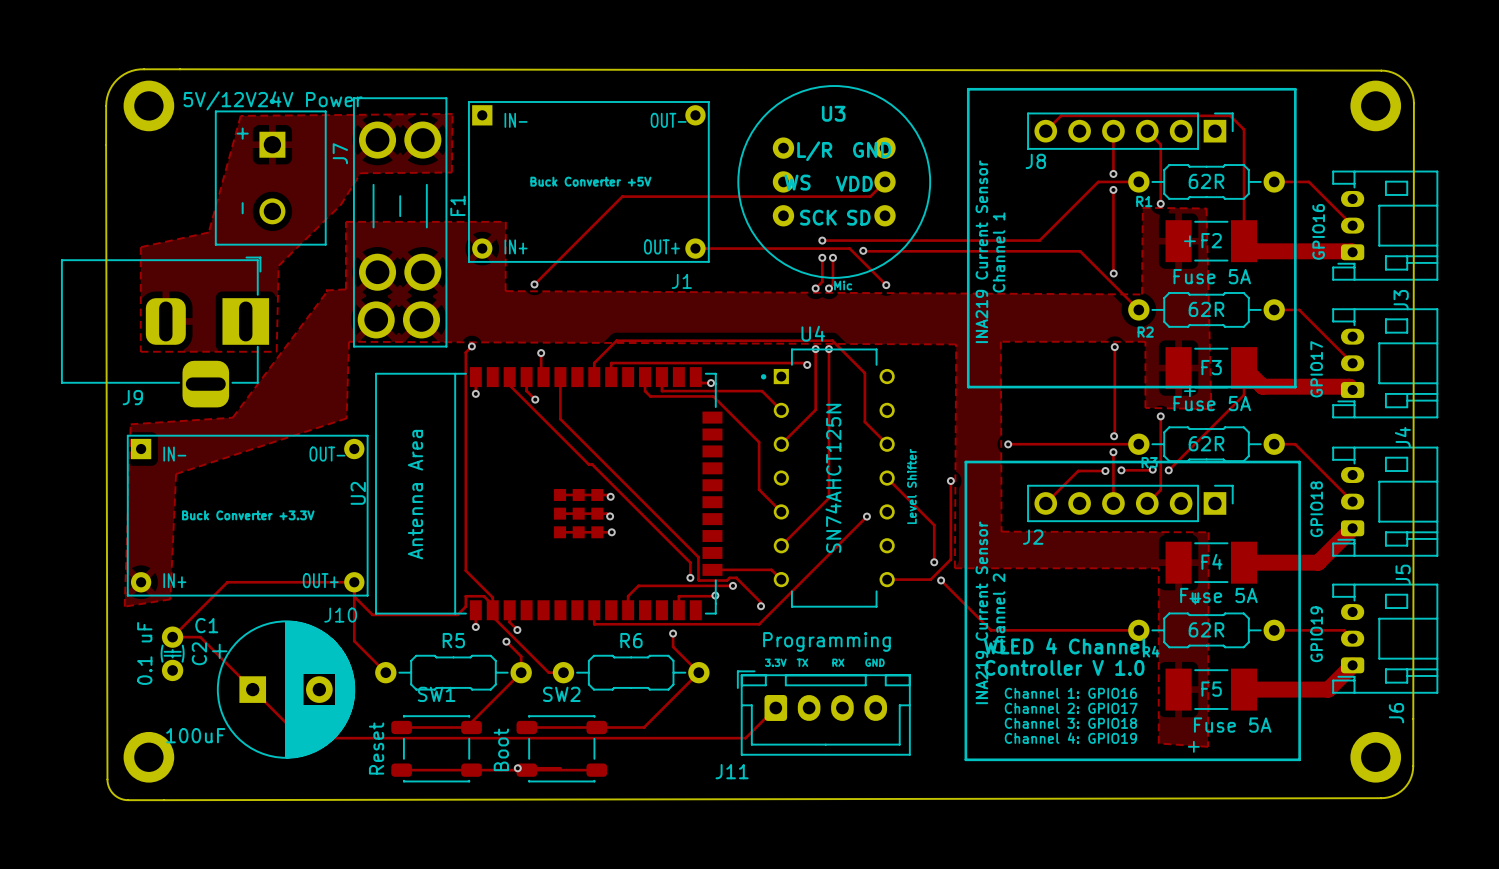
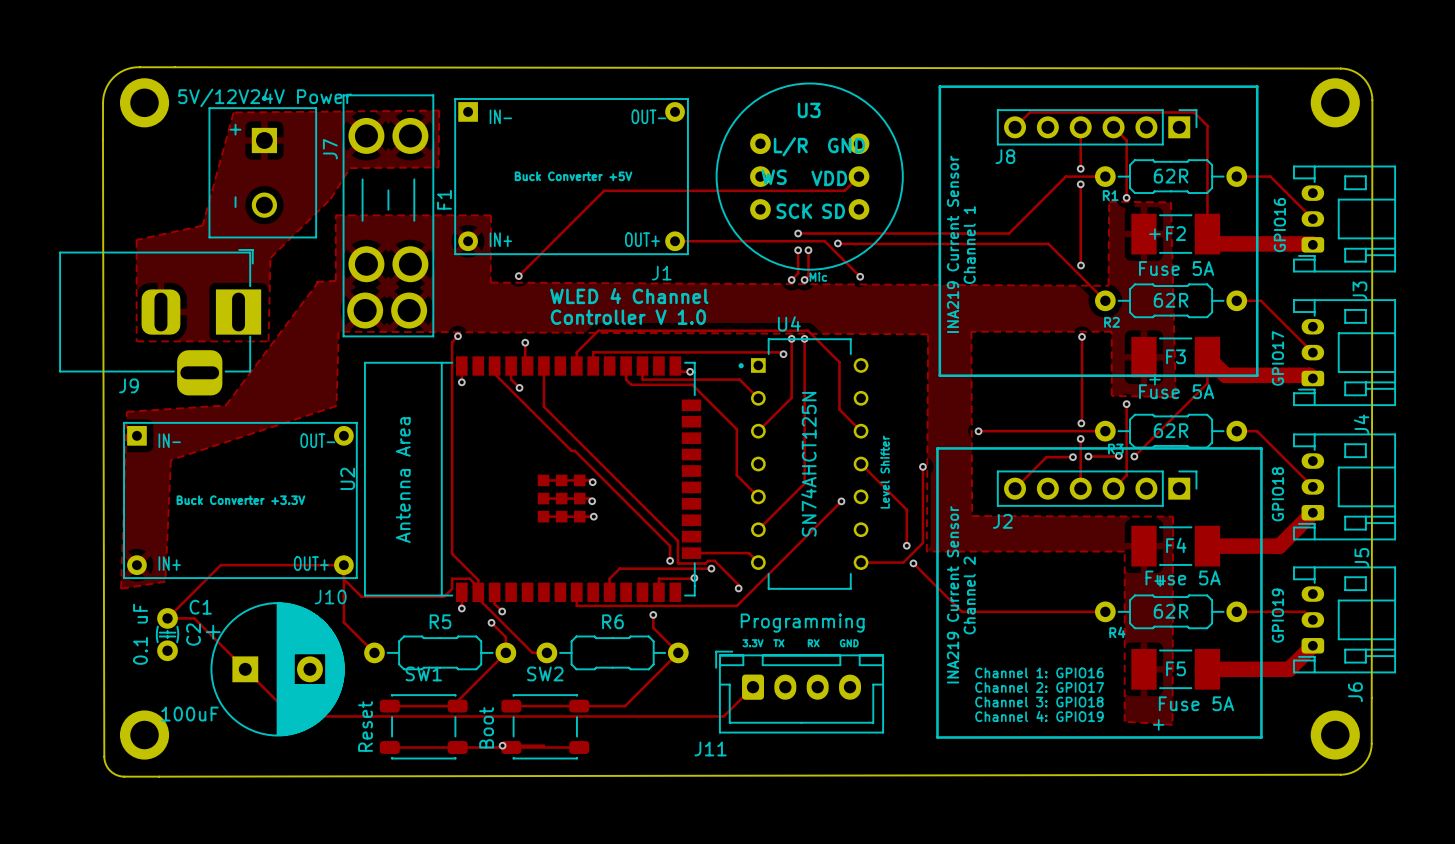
text: none -> WLED 4 Channel (629, 296)
text: none -> Controller V 1.0 (628, 317)
text: WLED 4 Channel (1065, 646) -> none
text: Controller V 1.0 (1064, 667) -> none

